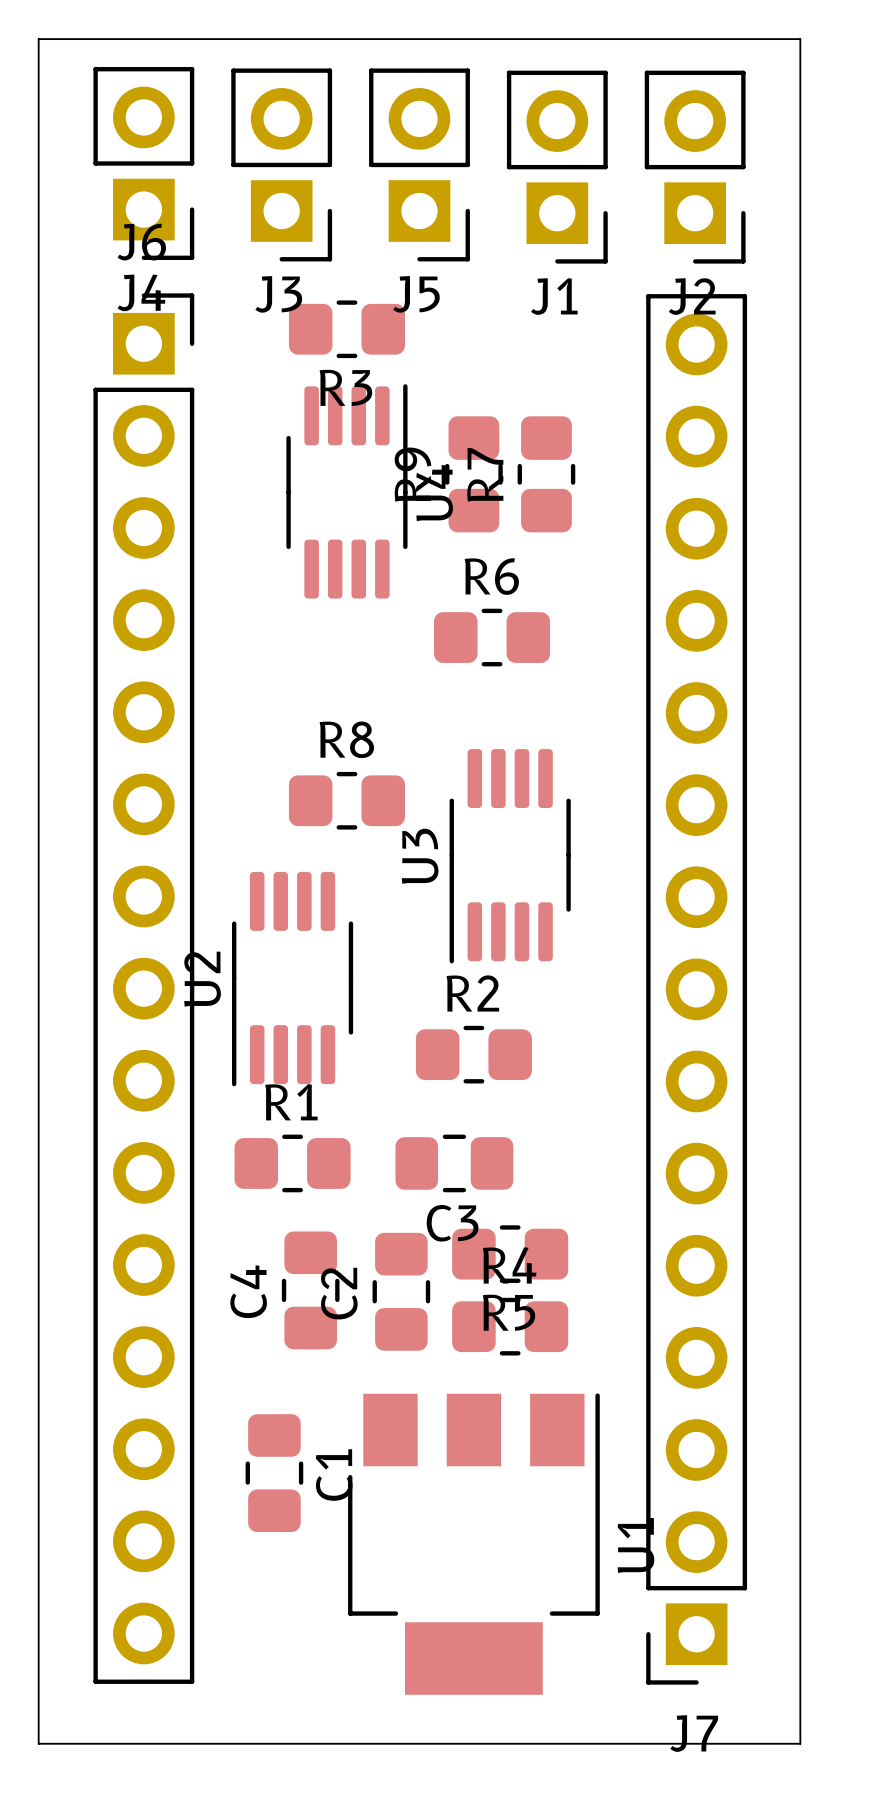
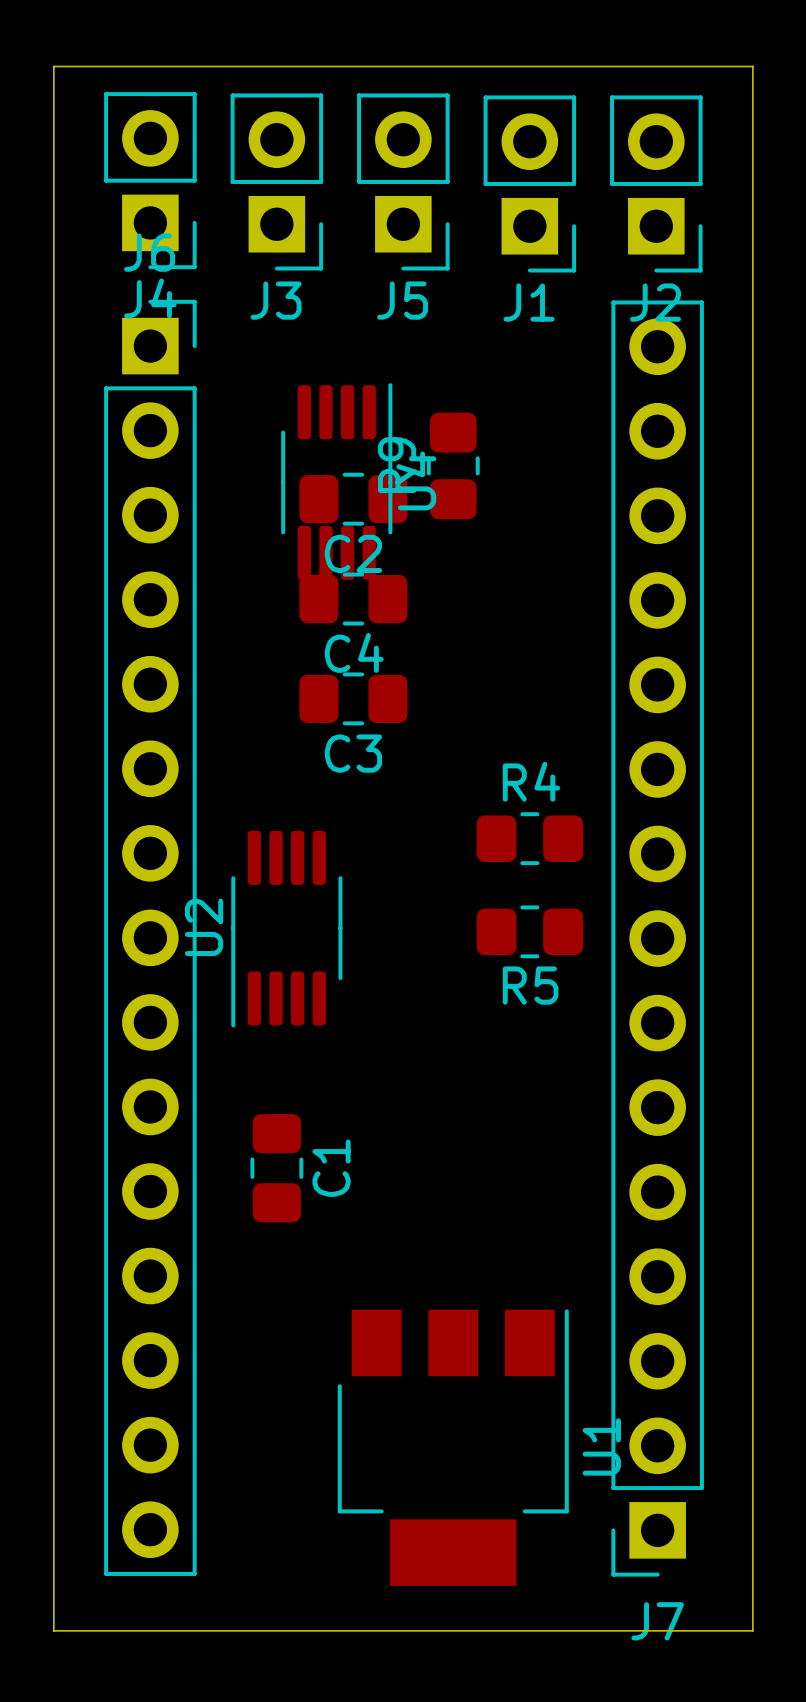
R3: (346, 329) -> none
R7: (546, 474) -> none
R6: (492, 637) -> none
R8: (346, 800) -> none
U3: (510, 856) -> none
R2: (473, 1054) -> none
R1: (292, 1163) -> none
C3 position: (454, 1163) -> (353, 698)
R5 position: (510, 1254) -> (529, 931)
C4 rotation: 0° (310, 1290) -> 90° clockwise (353, 599)
C4 position: (310, 1290) -> (353, 599)
C4 name position: C4 (248, 1291) -> C4 (354, 652)
C2 rotation: 0° (401, 1291) -> 90° clockwise (353, 499)
C2 position: (401, 1291) -> (353, 499)
C2 name position: C2 (339, 1293) -> C2 (353, 553)
R4 position: (510, 1326) -> (529, 838)
C1 position: (274, 1473) -> (276, 1168)

